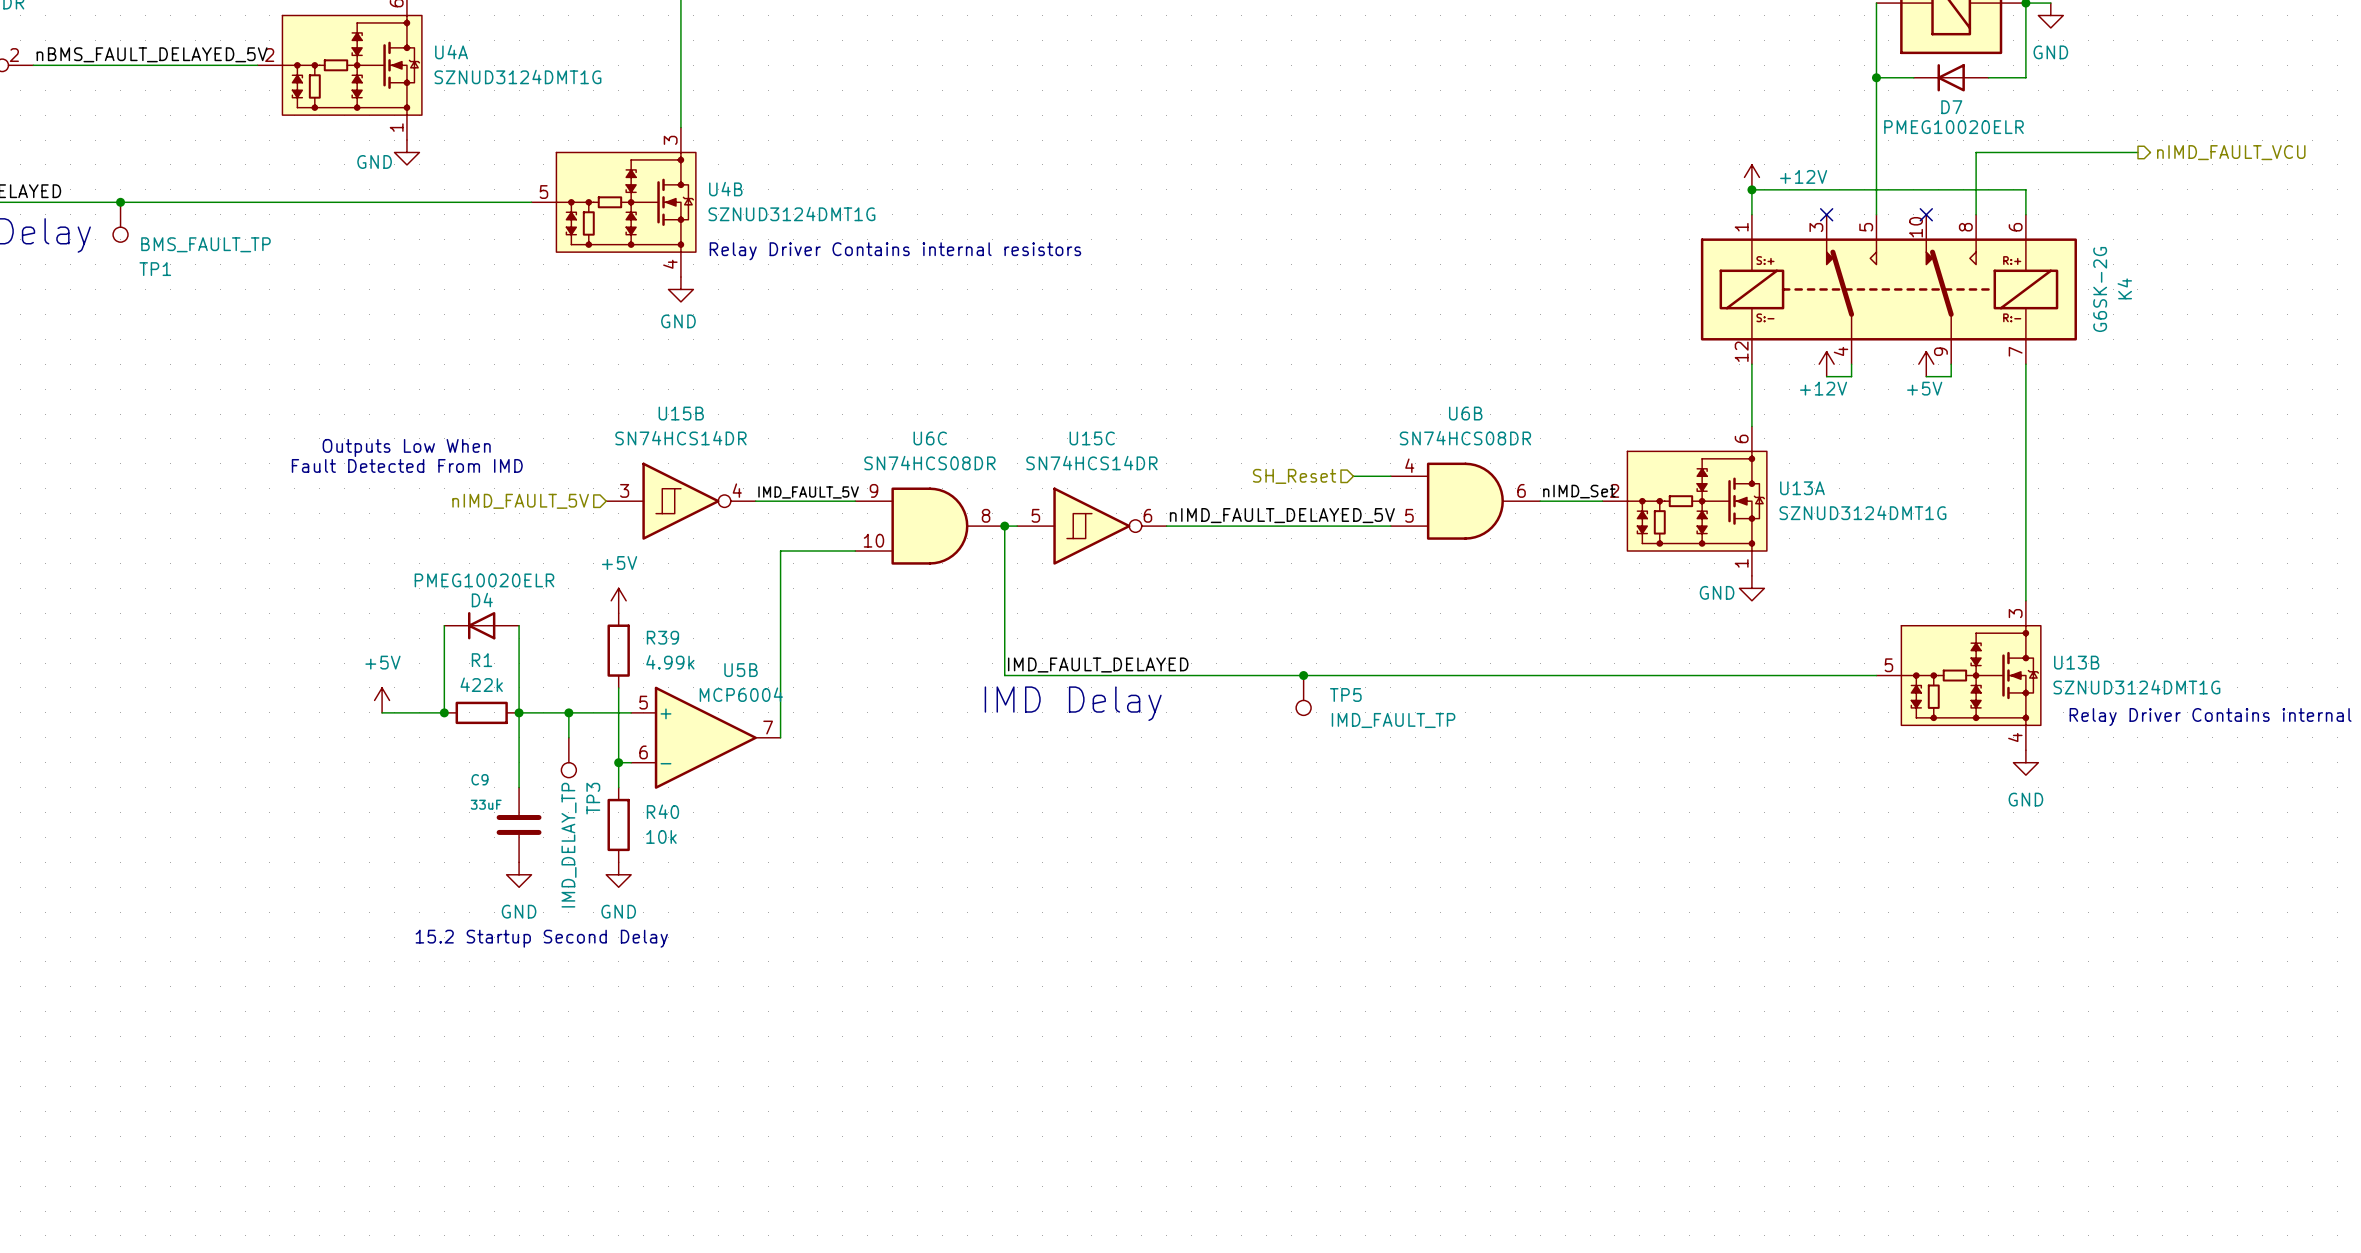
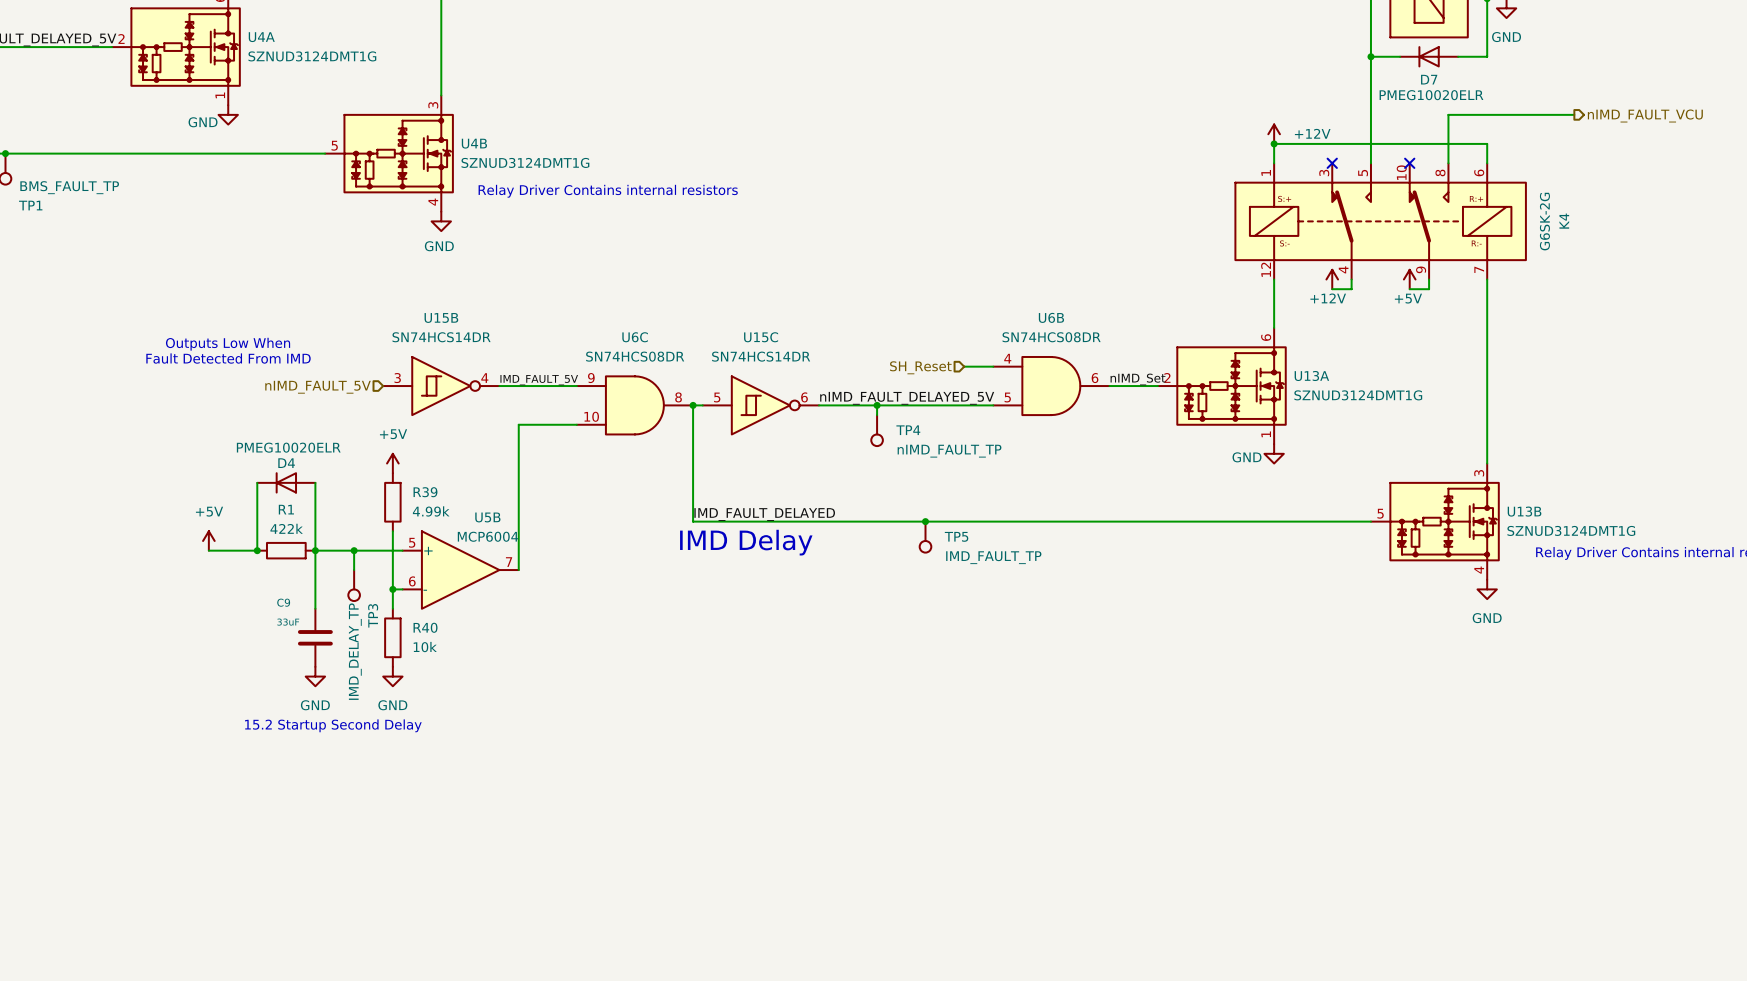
wire: none -> (877, 405) (877, 415)
junction: none -> (877, 405)
TP4: none -> nIMD_FAULT_TP (877, 430)

